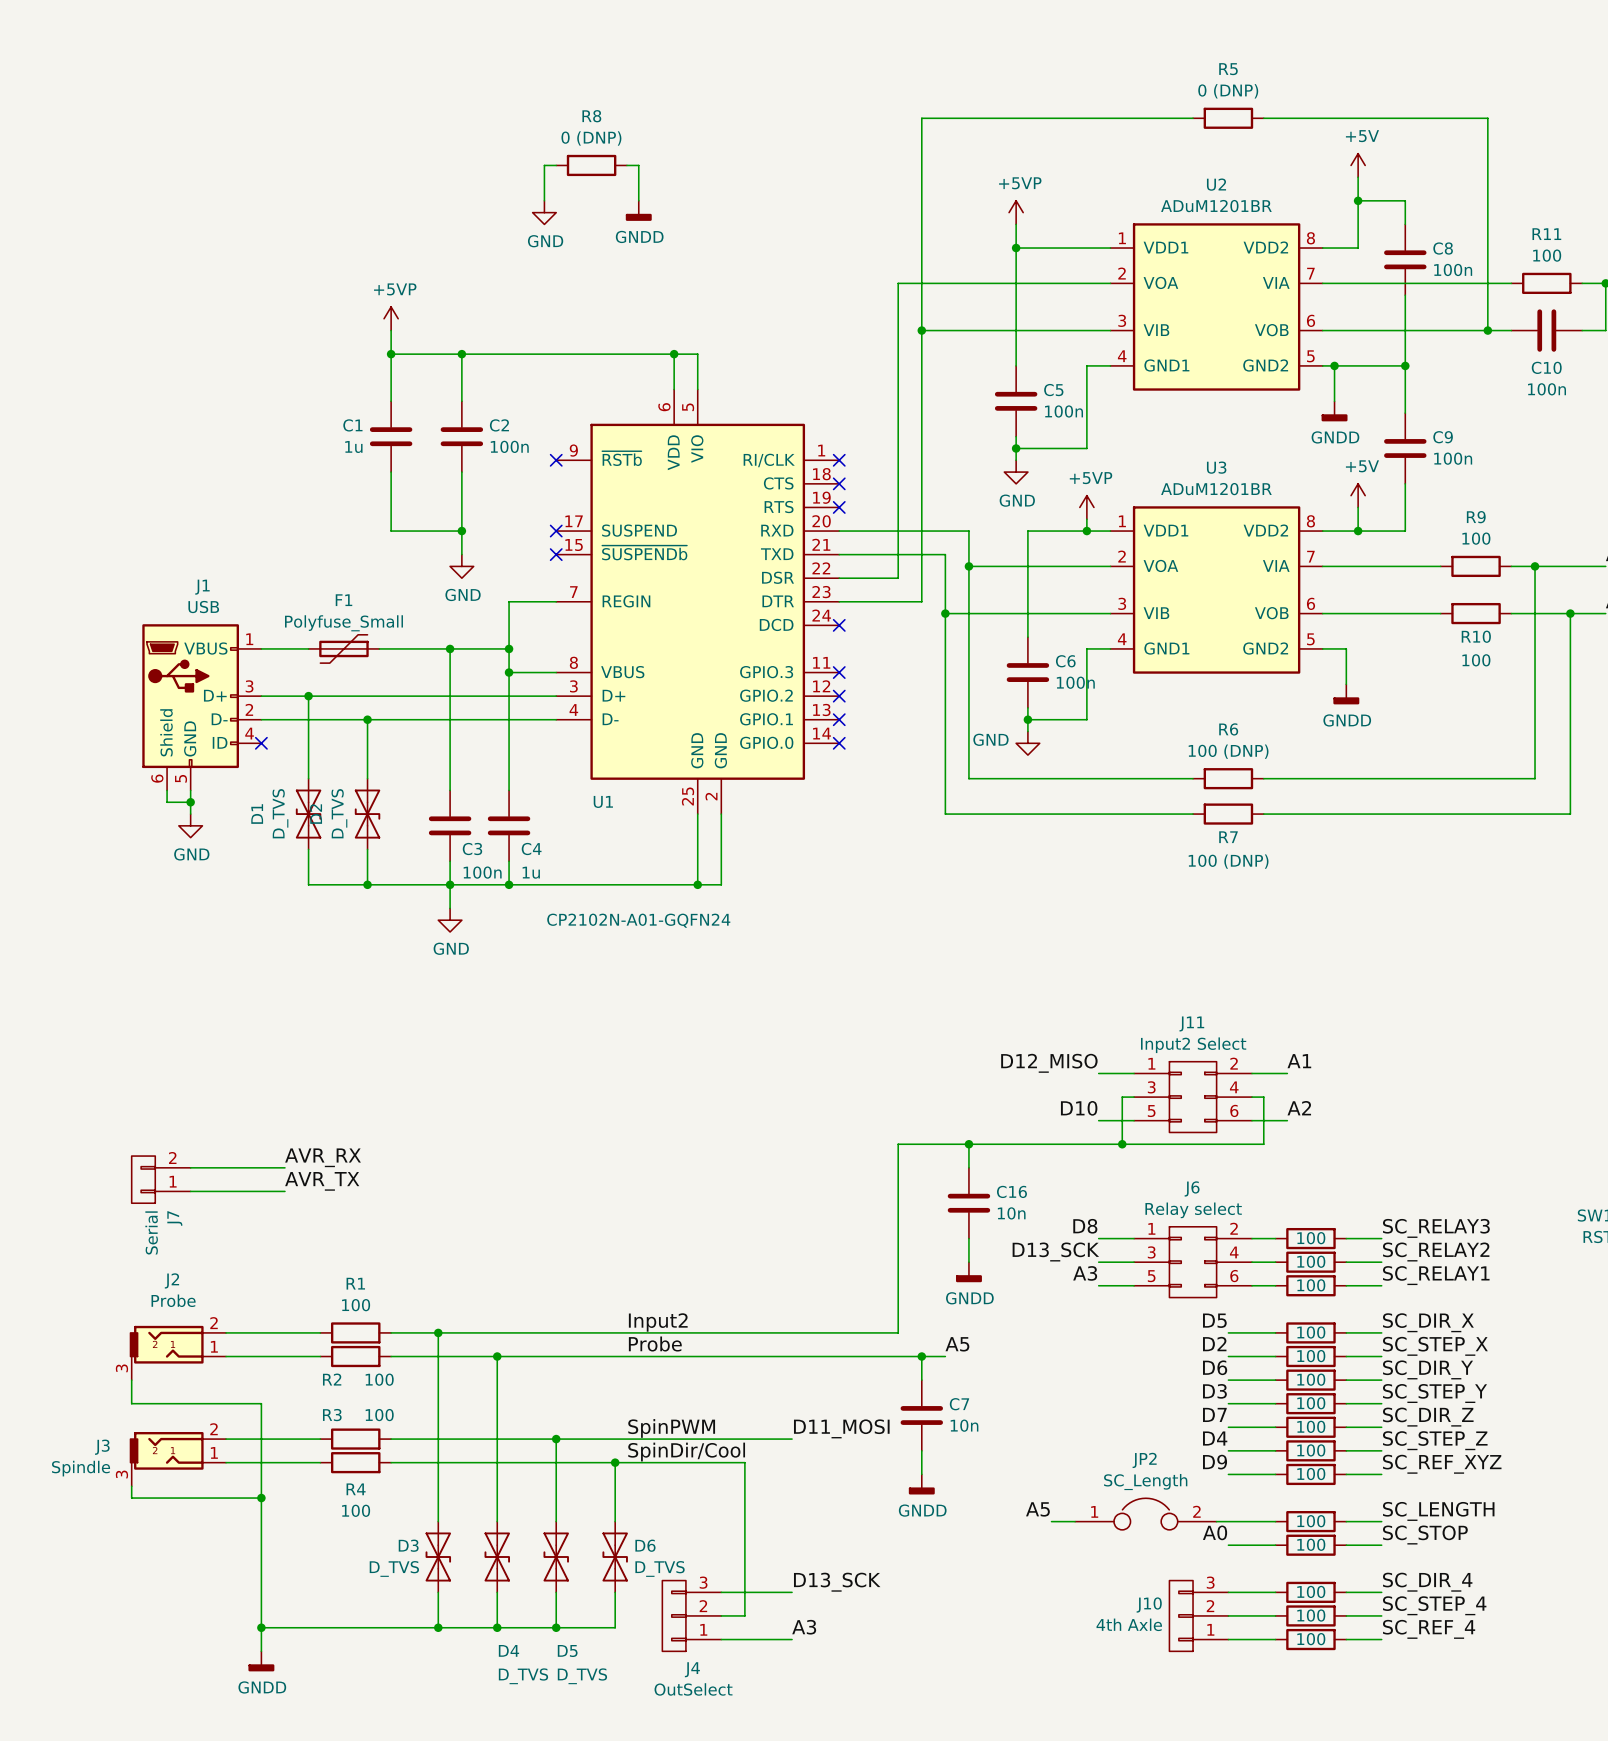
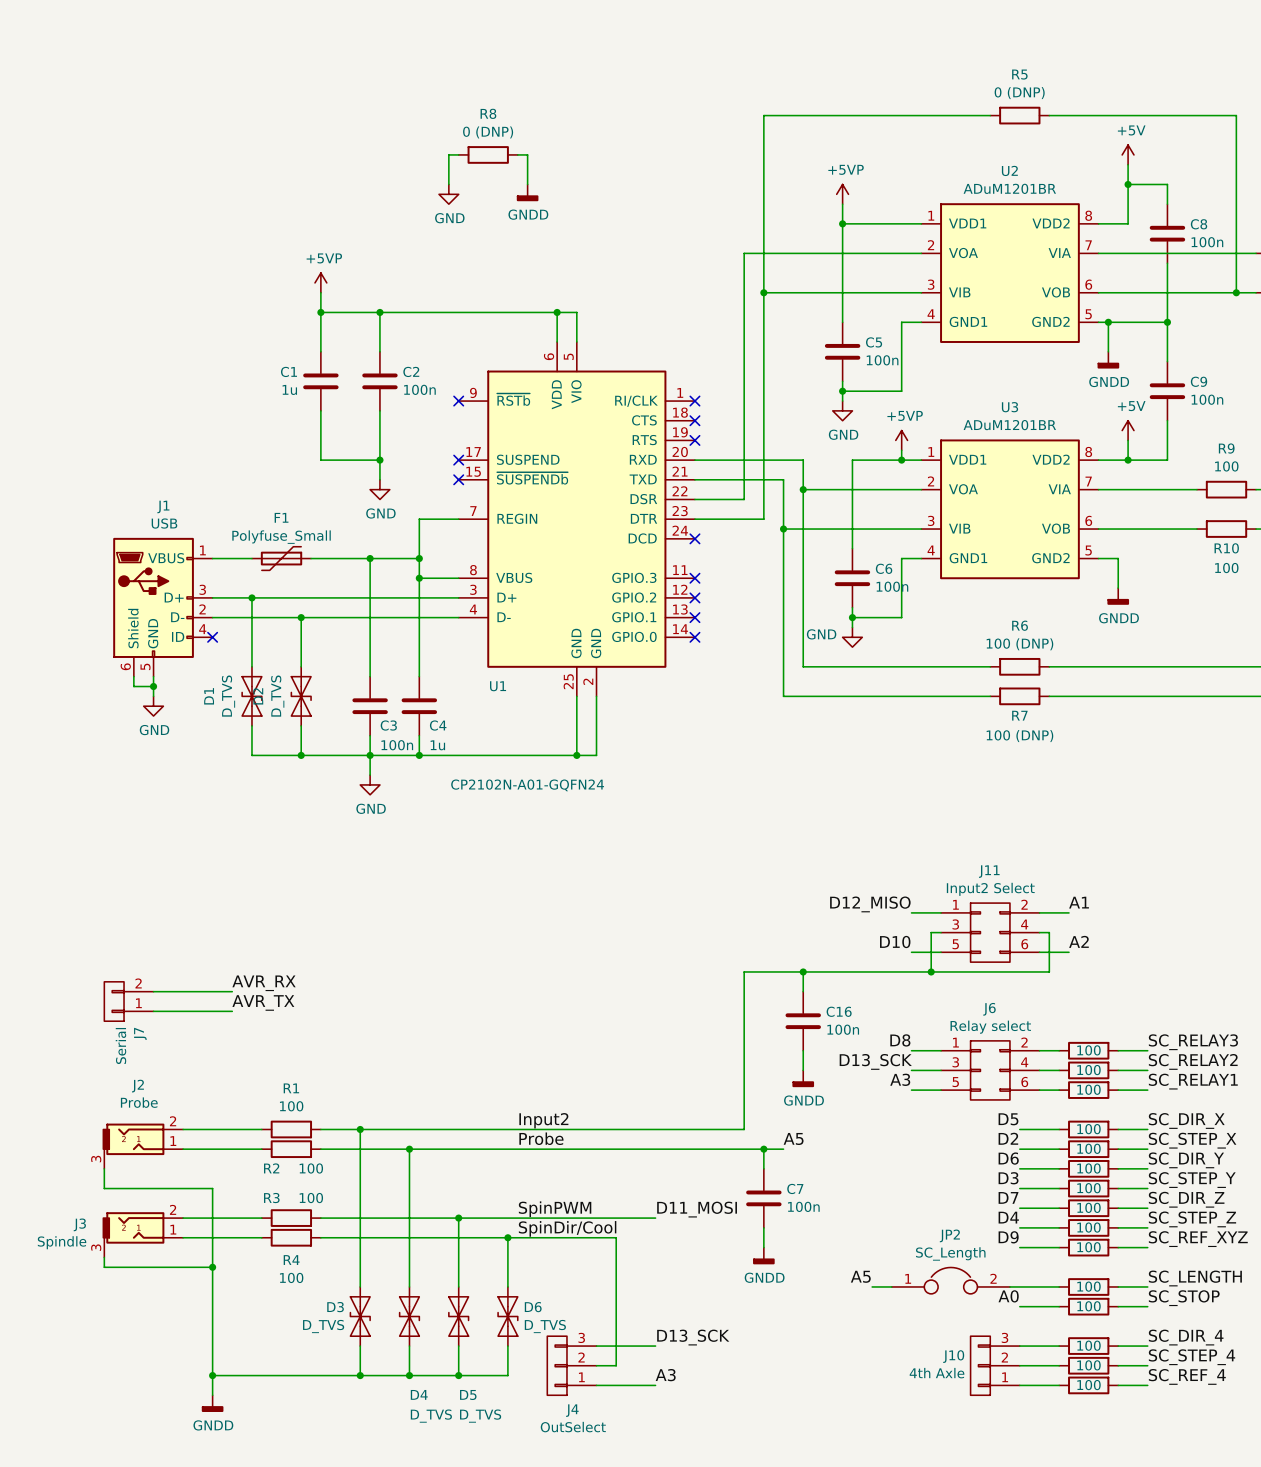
C16 value: 10n (1011, 1213) -> 100n (843, 1029)
C7 value: 10n (964, 1425) -> 100n (803, 1206)

